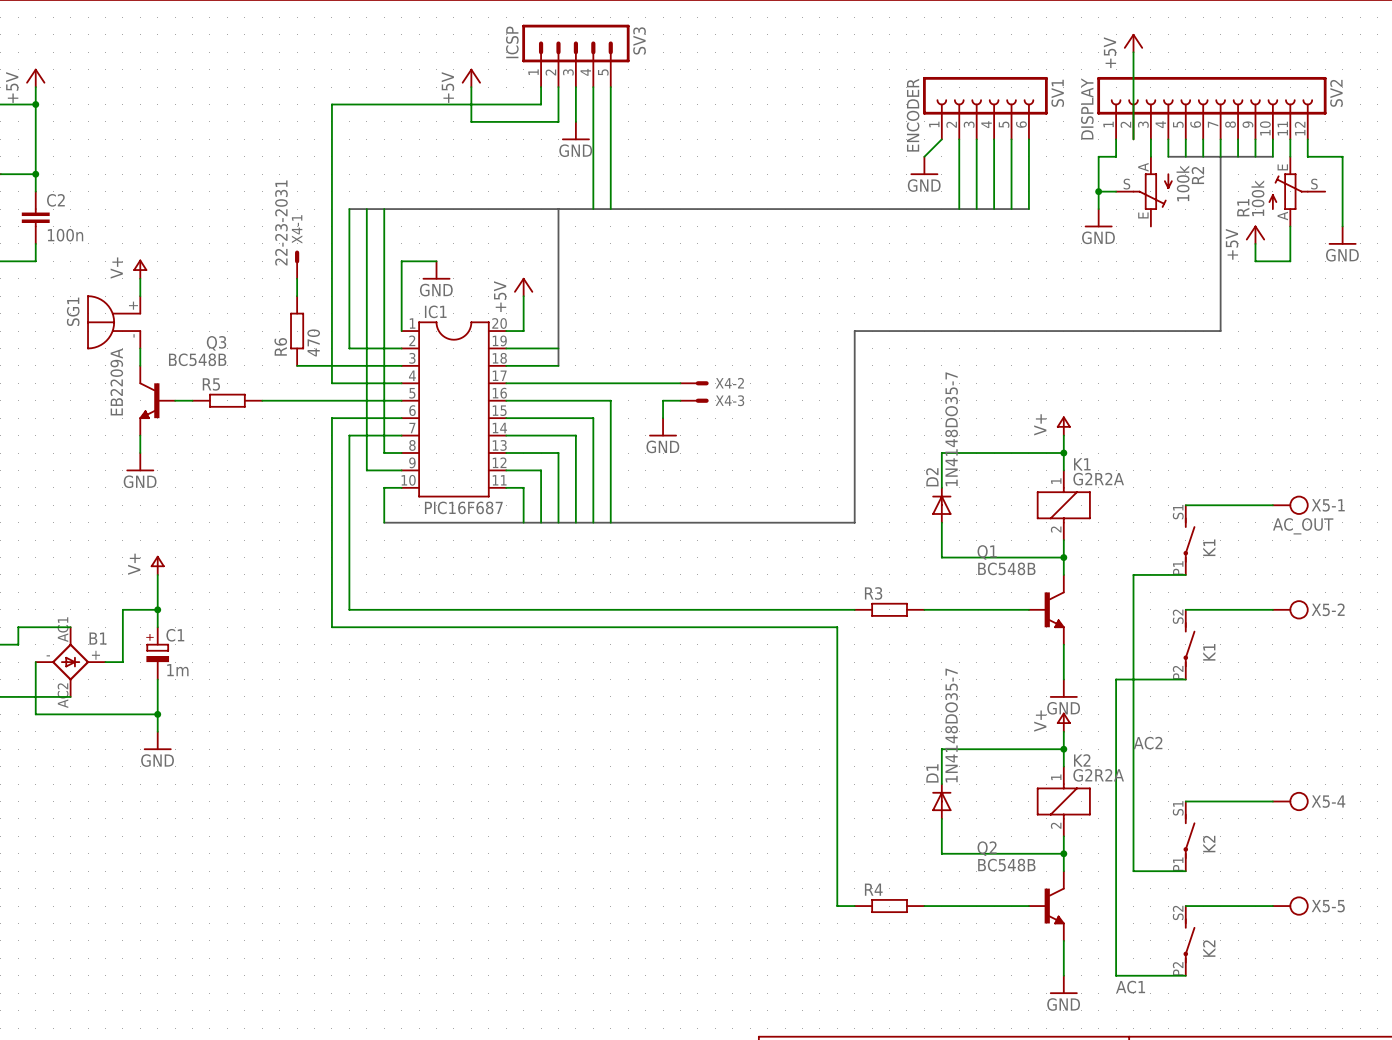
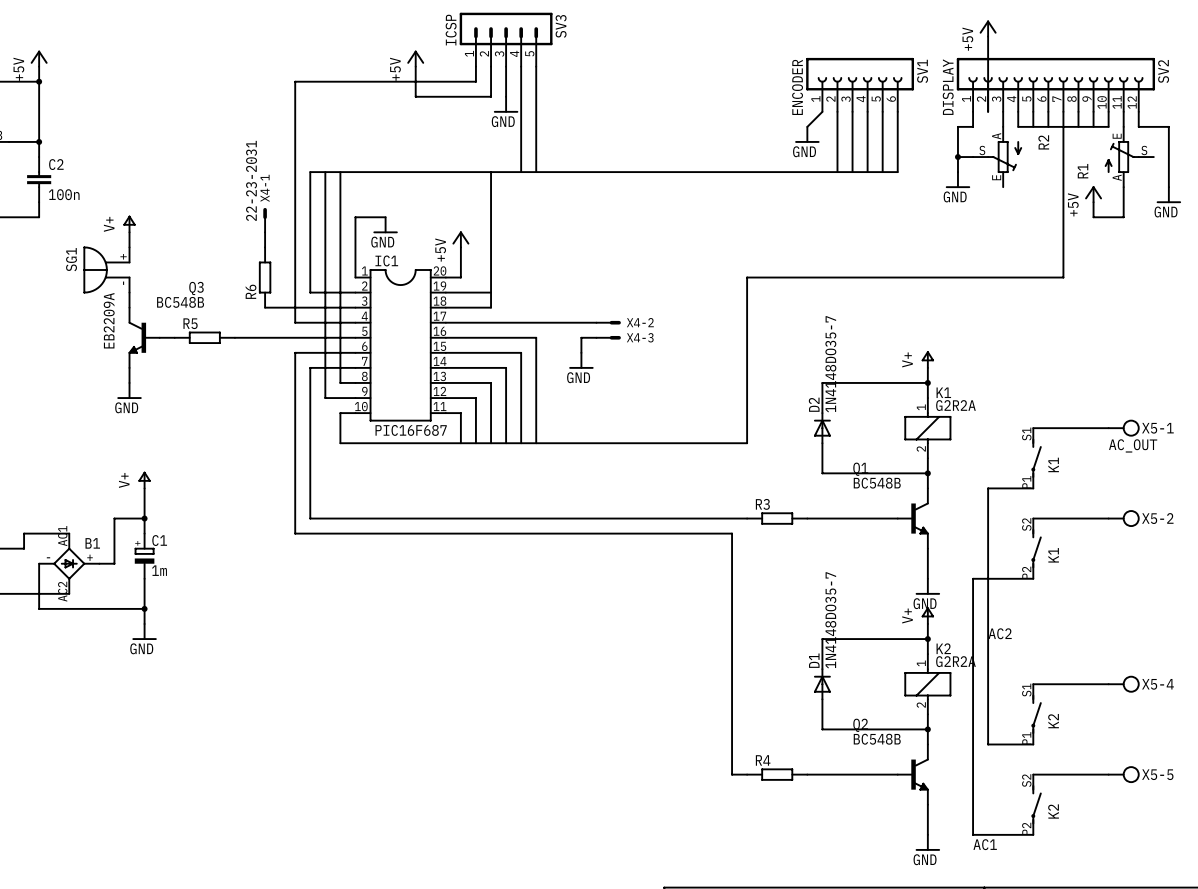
R2 value: 100k (1183, 183) -> none
R1 value: 100k (1257, 198) -> none
R6 value: 470 (313, 342) -> none

